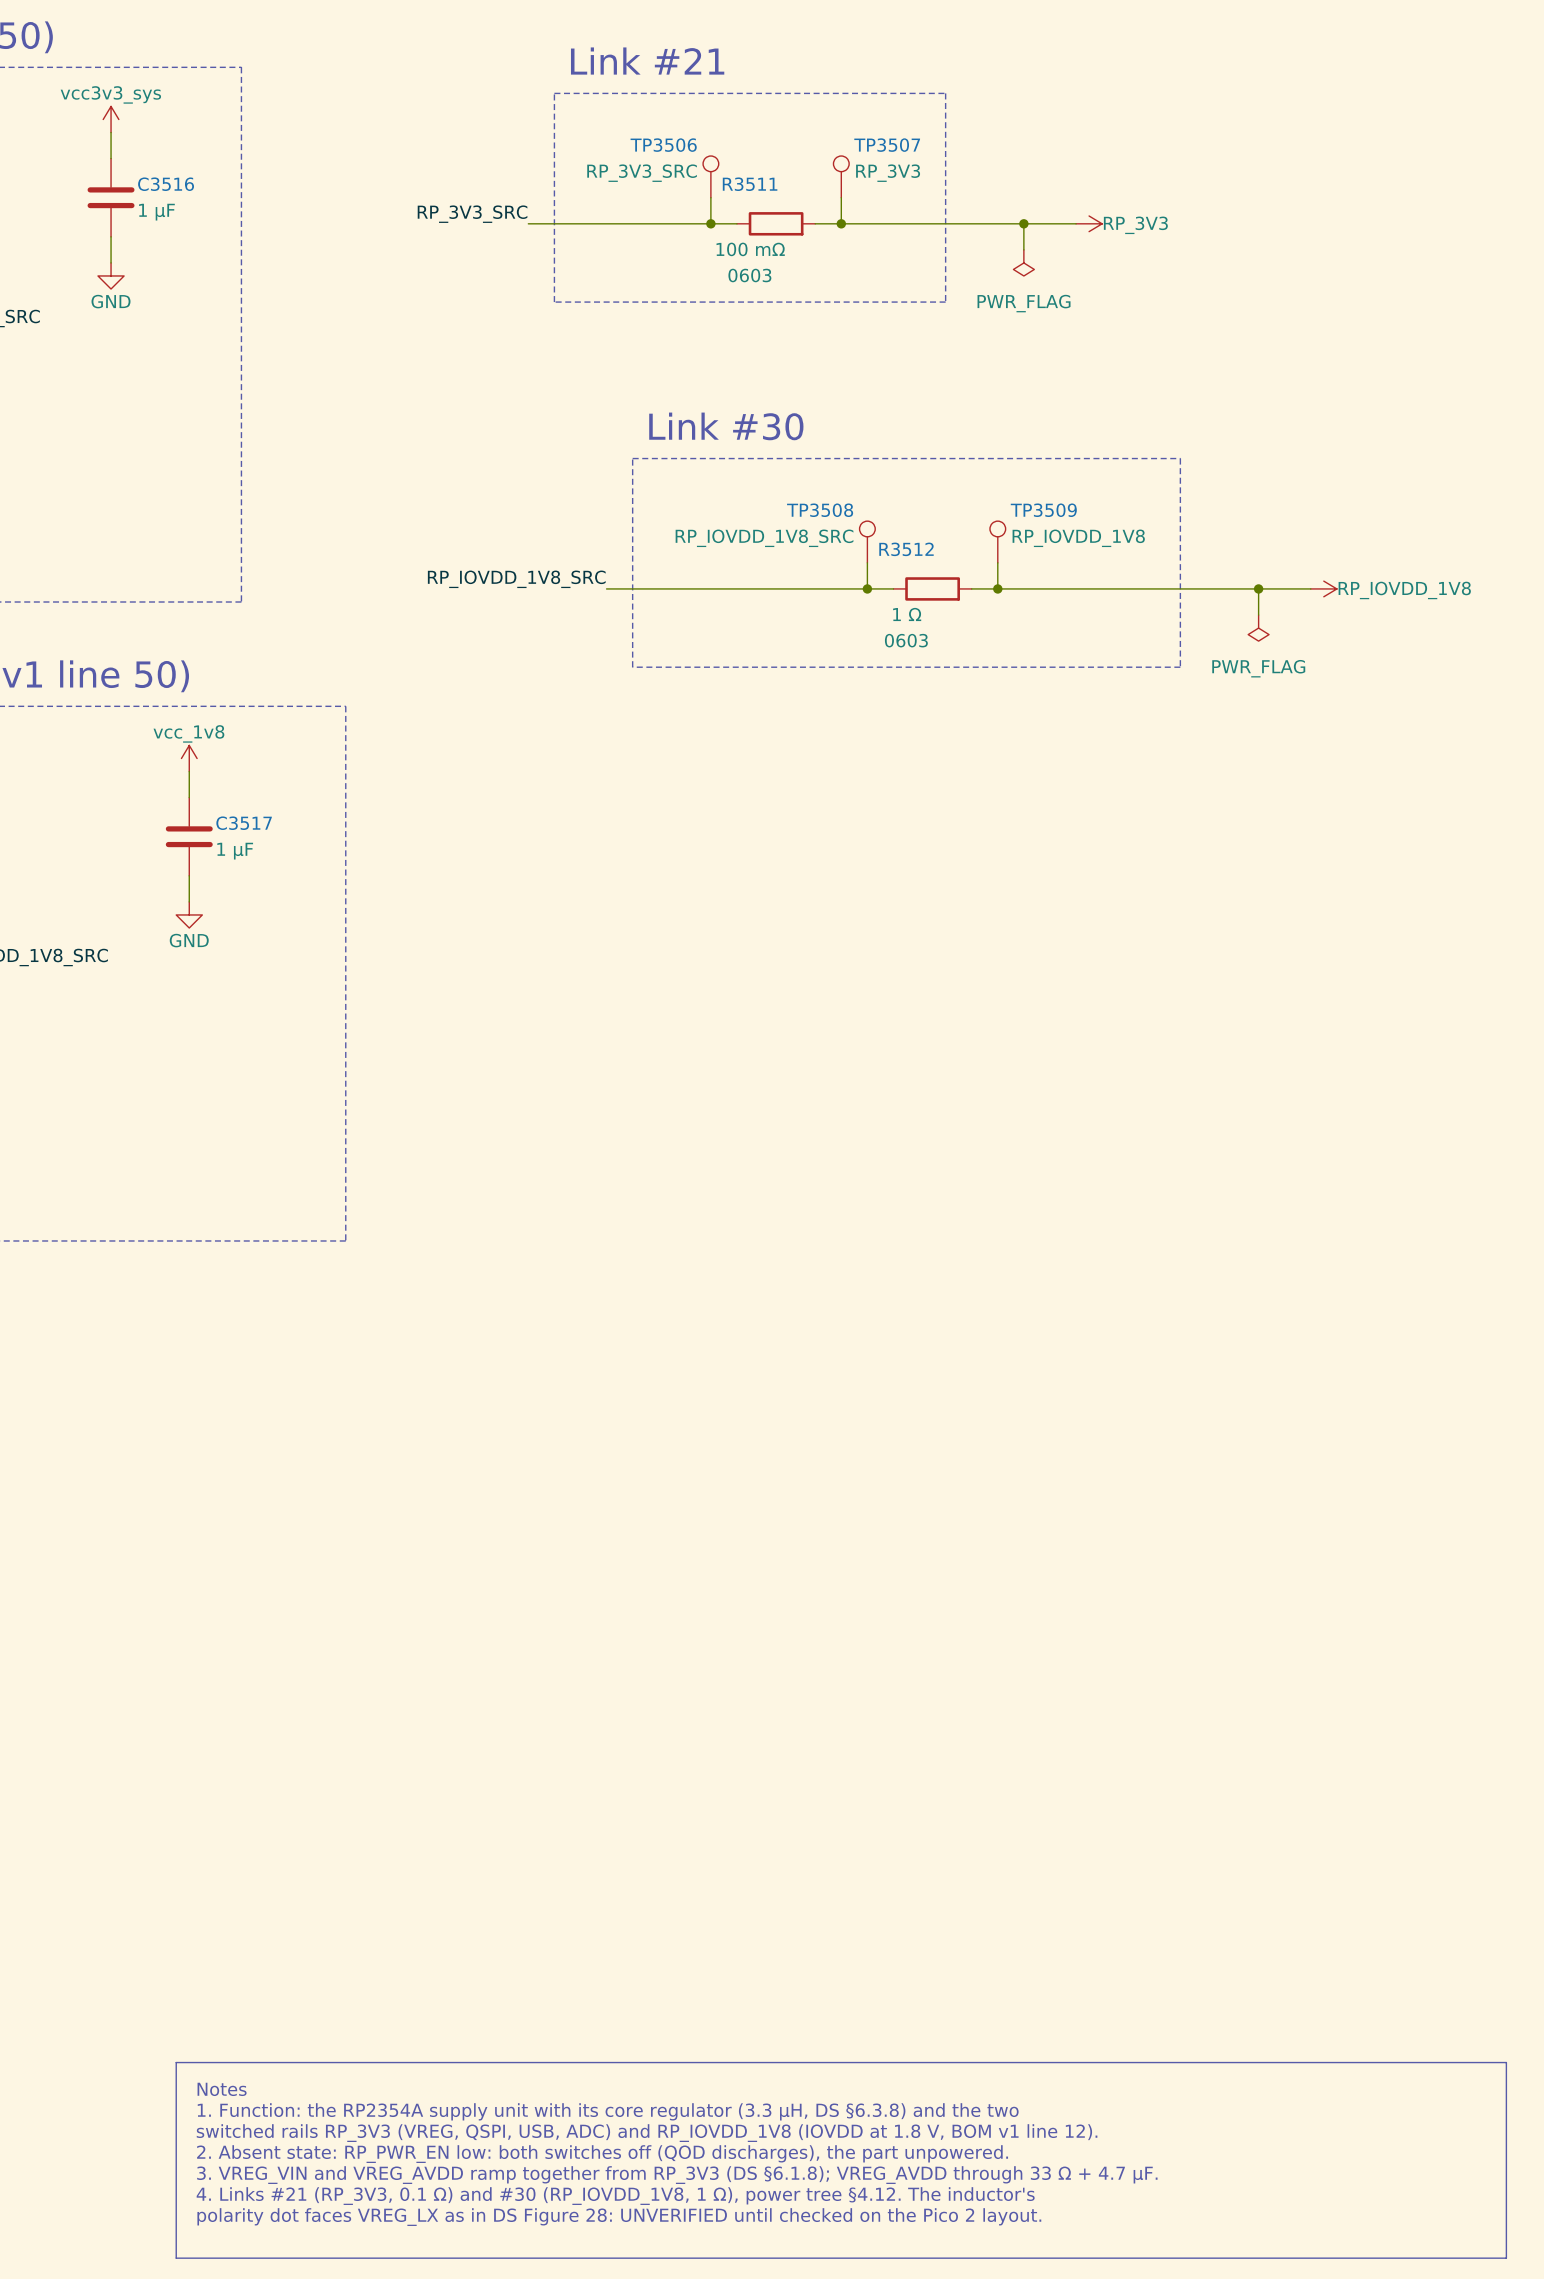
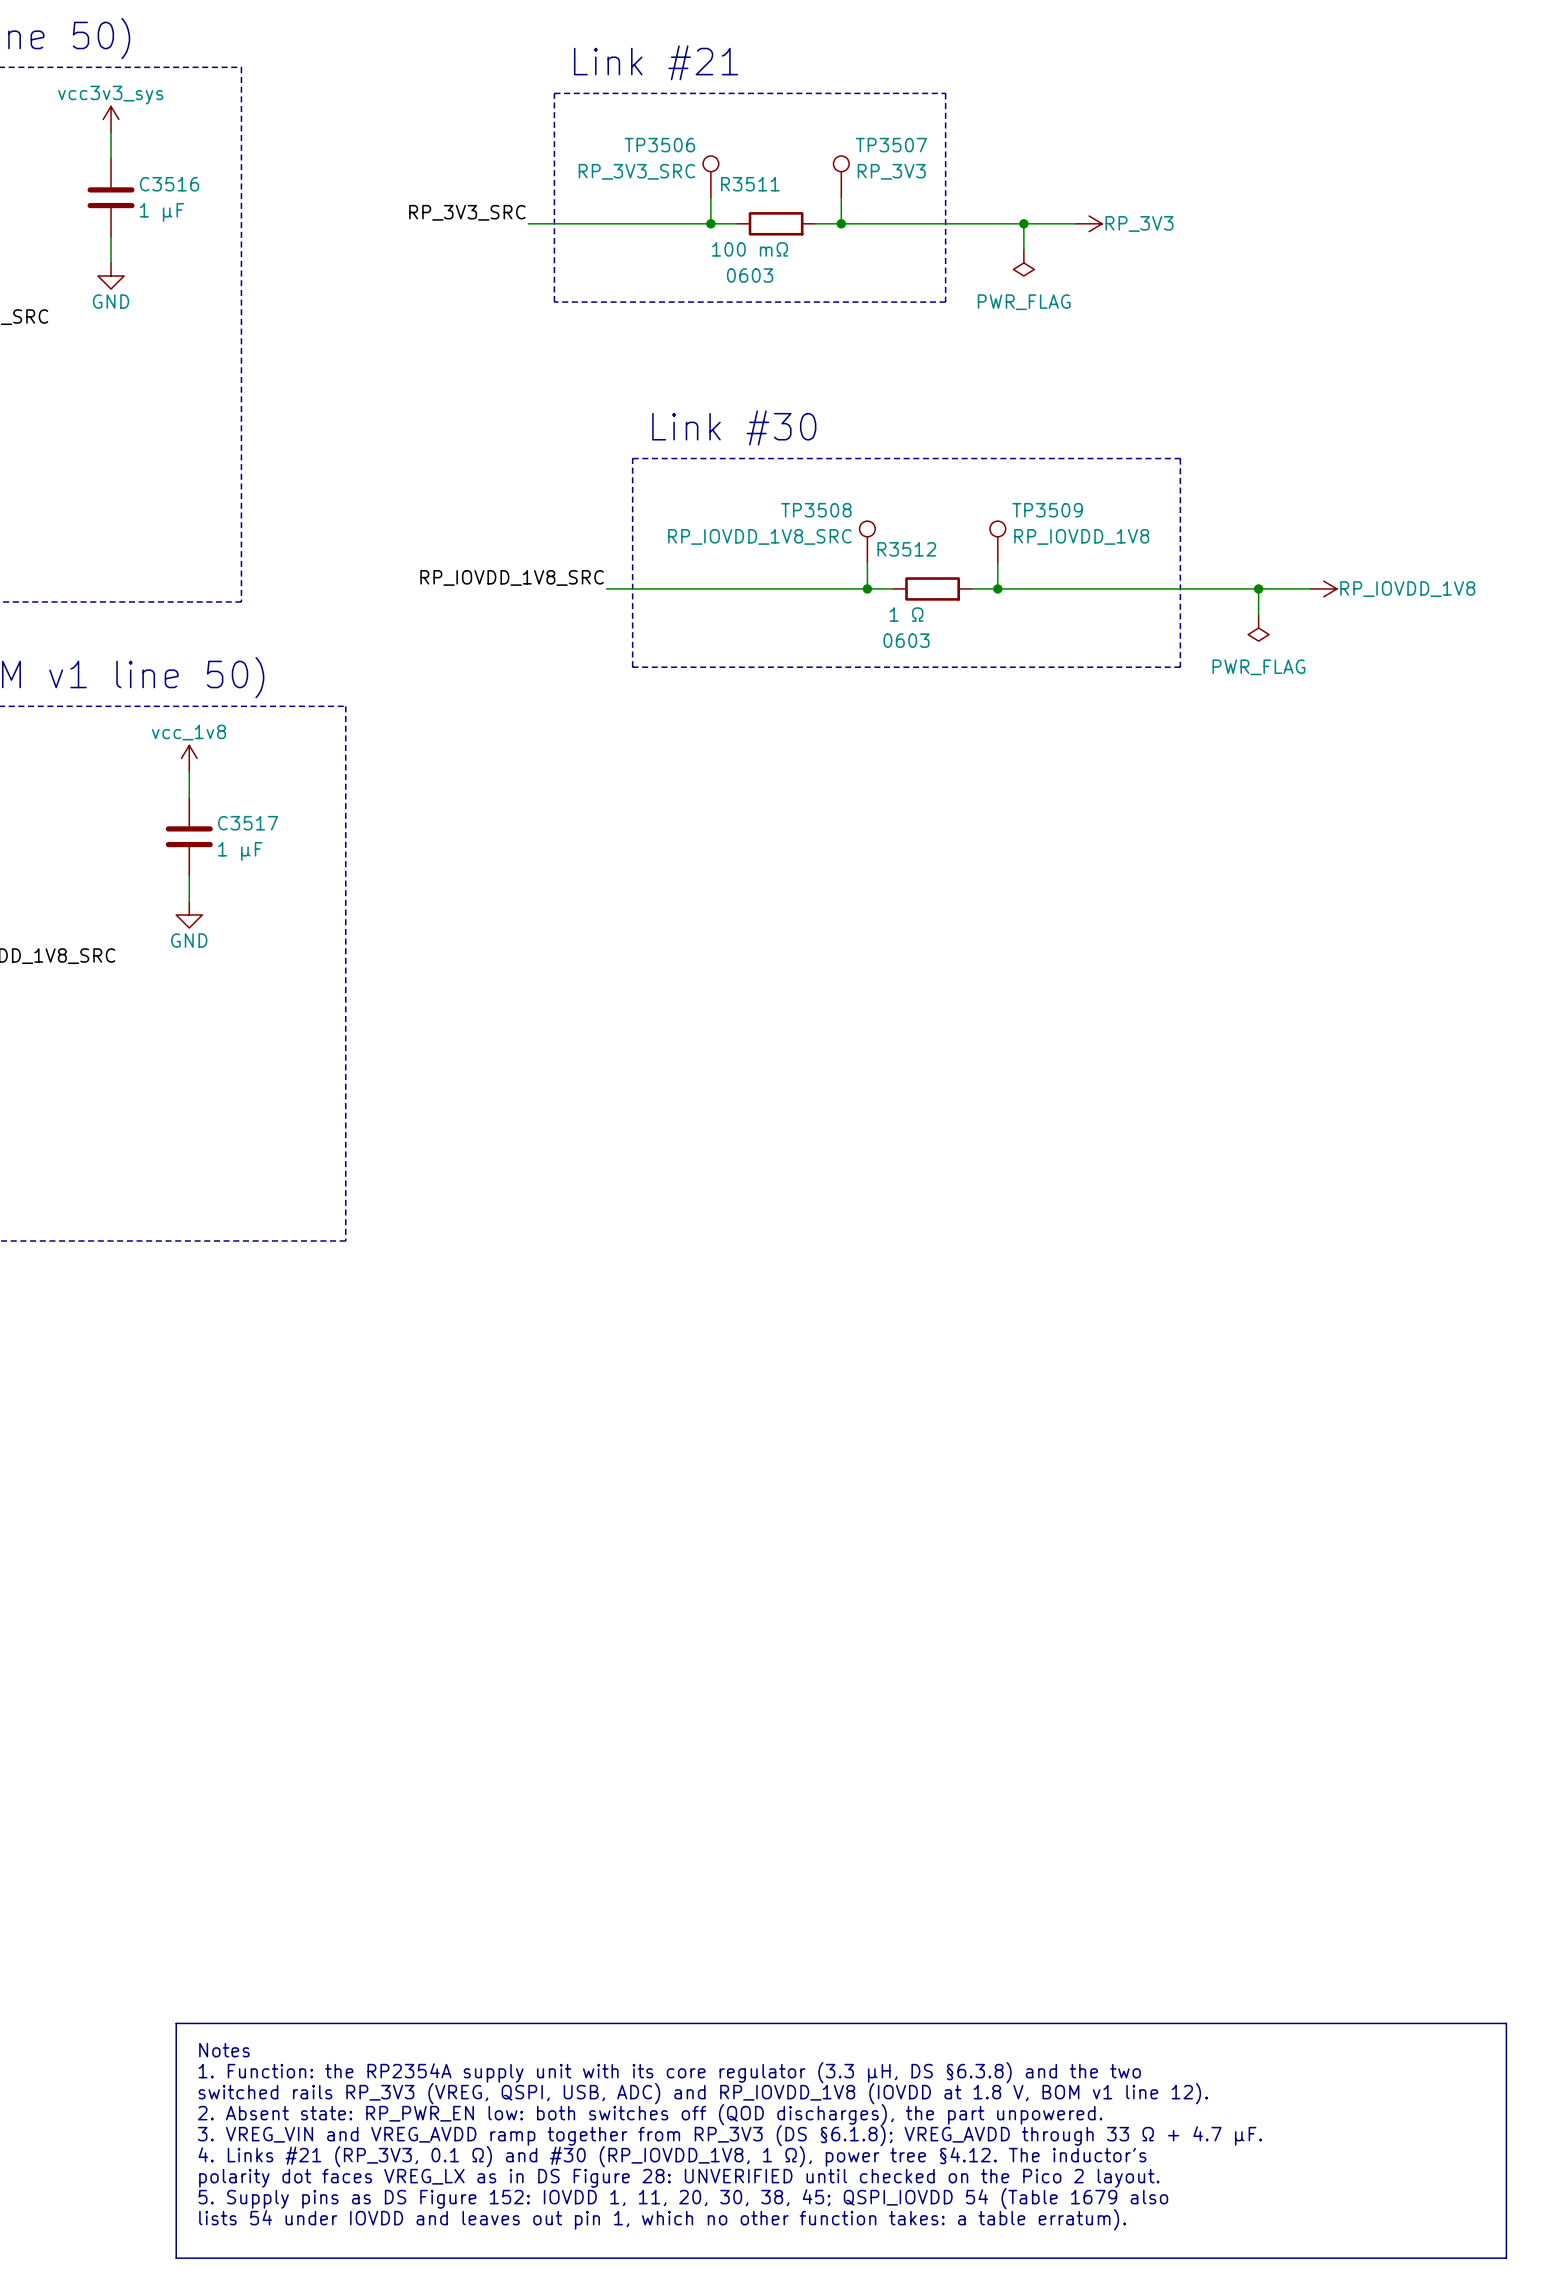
line: (176, 2062) (1506, 2062) -> (176, 2062) (176, 2023) (1506, 2023) (1506, 2062)
text position: Notes (222, 2089) -> Notes (224, 2050)
text position: 1. Function: the RP2354A supply unit with its core regulator (3.3 µH, DS §6.3.8) and the two (608, 2111) -> 1. Function: the RP2354A supply unit with its core regulator (3.3 µH, DS §6.3.8) and the two (669, 2072)
text position: switched rails RP_3V3 (VREG, QSPI, USB, ADC) and RP_IOVDD_1V8 (IOVDD at 1.8 V, BOM v1 line 12). (647, 2133) -> switched rails RP_3V3 (VREG, QSPI, USB, ADC) and RP_IOVDD_1V8 (IOVDD at 1.8 V, BOM v1 line 12). (703, 2093)
text position: 2. Absent state: RP_PWR_EN low: both switches off (QOD discharges), the part unpowered. (602, 2154) -> 2. Absent state: RP_PWR_EN low: both switches off (QOD discharges), the part unpowered. (650, 2114)
text position: 3. VREG_VIN and VREG_AVDD ramp together from RP_3V3 (DS §6.1.8); VREG_AVDD through 33 Ω + 4.7 µF. (677, 2175) -> 3. VREG_VIN and VREG_AVDD ramp together from RP_3V3 (DS §6.1.8); VREG_AVDD through 33 Ω + 4.7 µF. (729, 2135)
text position: 4. Links #21 (RP_3V3, 0.1 Ω) and #30 (RP_IOVDD_1V8, 1 Ω), power tree §4.12. The inductor's (615, 2196) -> 4. Links #21 (RP_3V3, 0.1 Ω) and #30 (RP_IOVDD_1V8, 1 Ω), power tree §4.12. The inductor's (672, 2156)
text: none -> 5. Supply pins as DS Figure 152: IOVDD 1, 11, 20, 30, 38, 45; QSPI_IOVDD 54 (Table 1679 also (683, 2198)
text position: polarity dot faces VREG_LX as in DS Figure 28: UNVERIFIED until checked on the Pico 2 layout. (619, 2217) -> polarity dot faces VREG_LX as in DS Figure 28: UNVERIFIED until checked on the Pico 2 layout. (679, 2178)
text: none -> lists 54 under IOVDD and leaves out pin 1, which no other function takes: a table erratum). (662, 2219)

